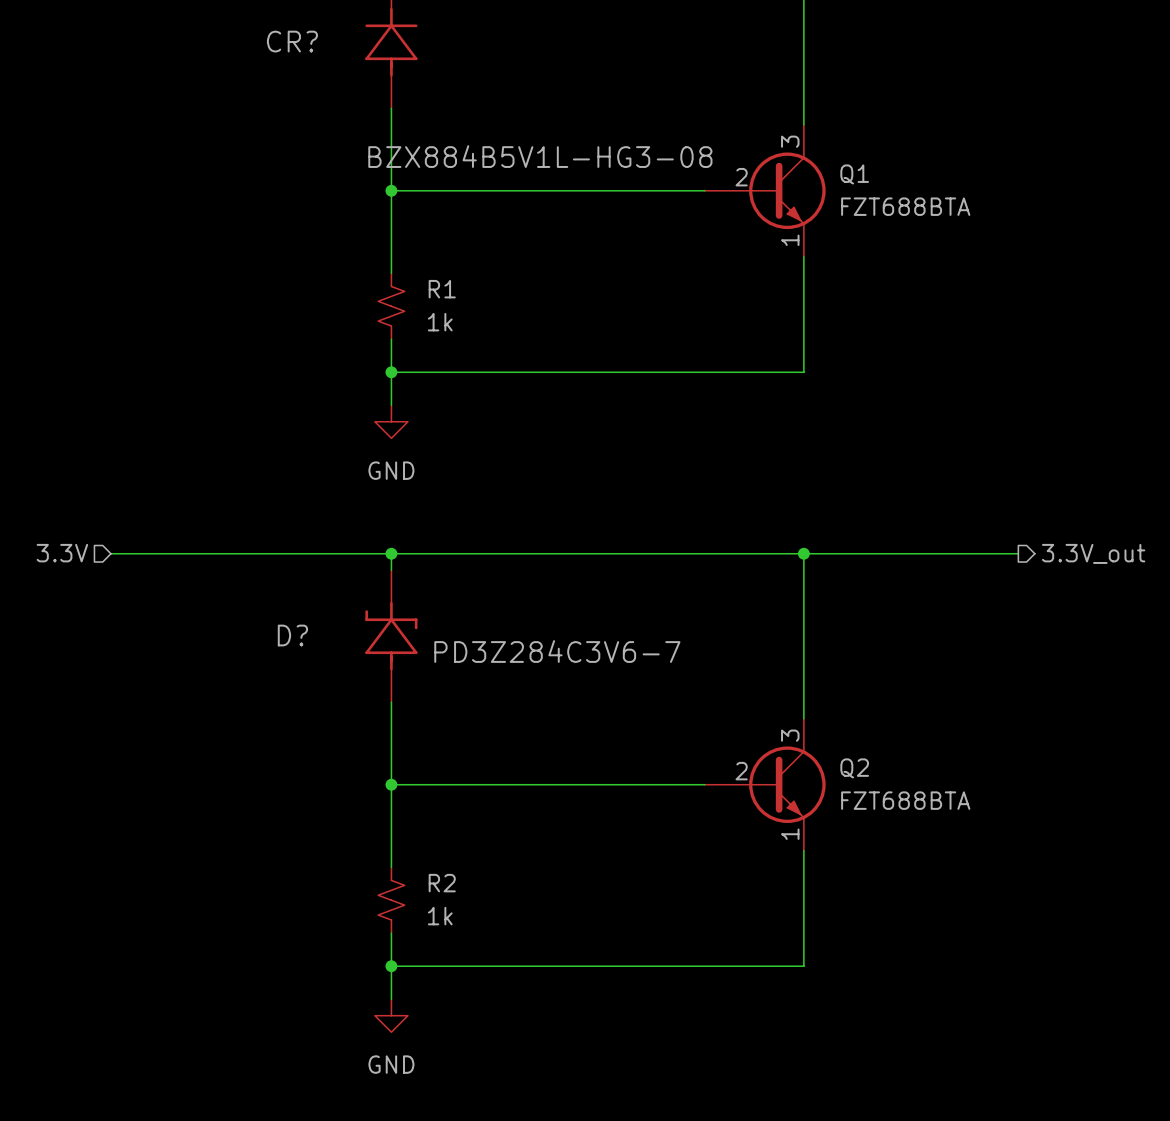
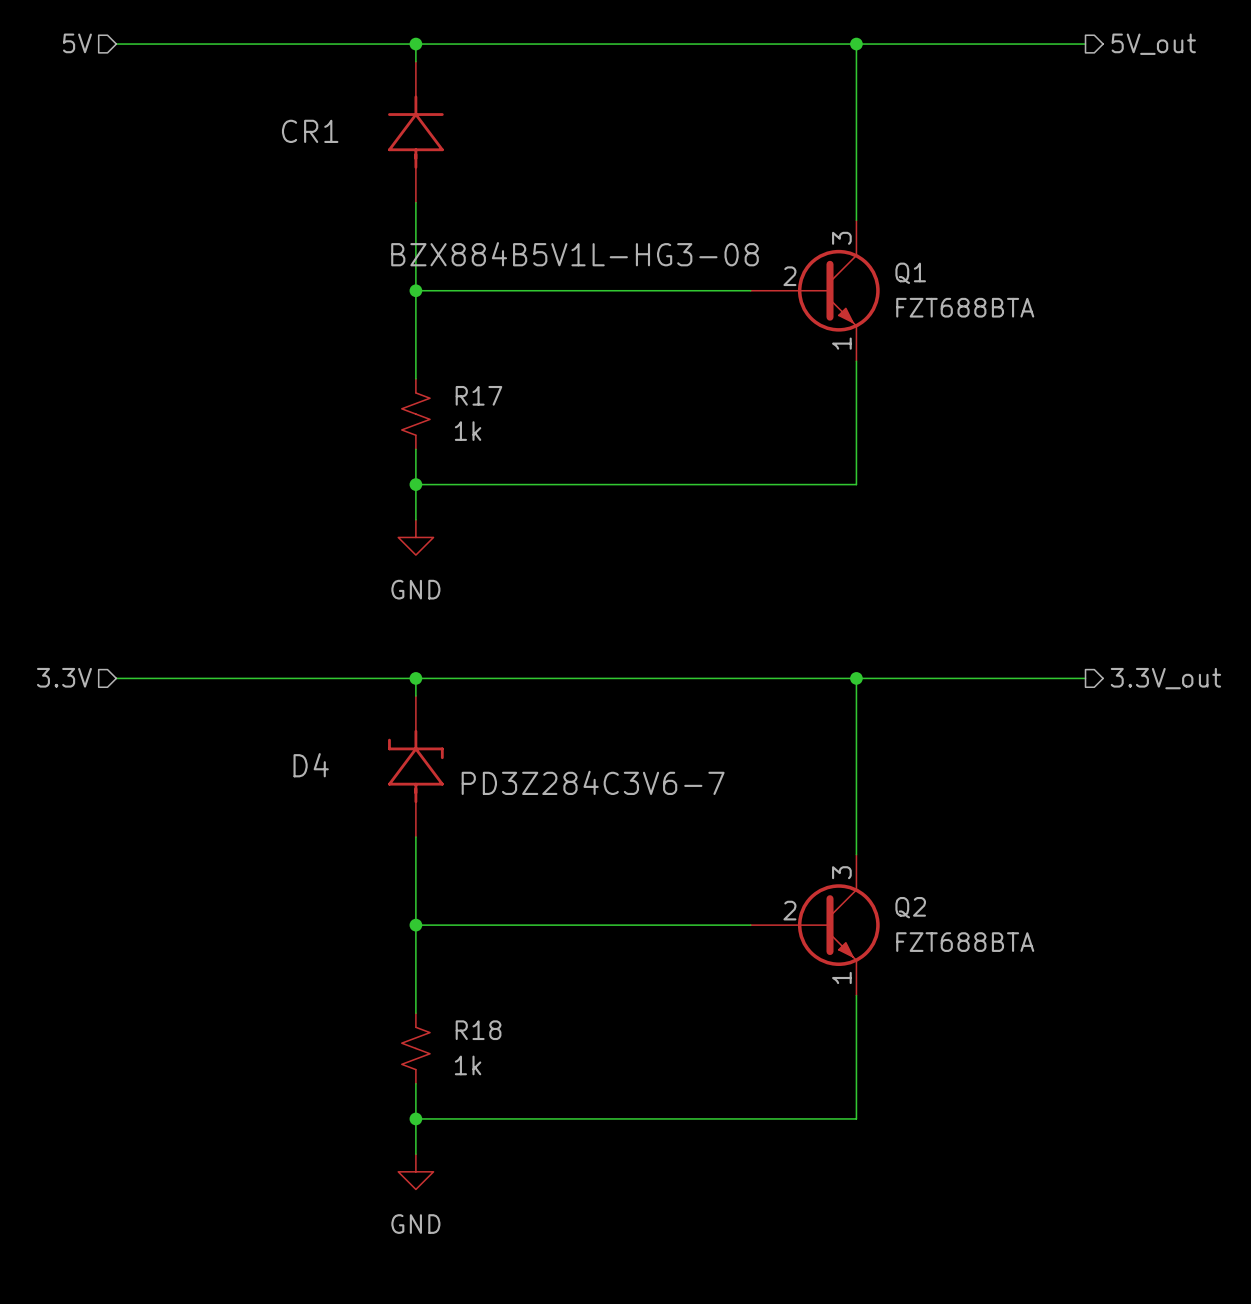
CR? name: CR? (292, 41) -> CR1 (310, 131)
R1 name: R1 (442, 289) -> R17 (478, 395)
D? name: D? (292, 635) -> D4 (311, 765)
R2 name: R2 (442, 883) -> R18 (478, 1030)

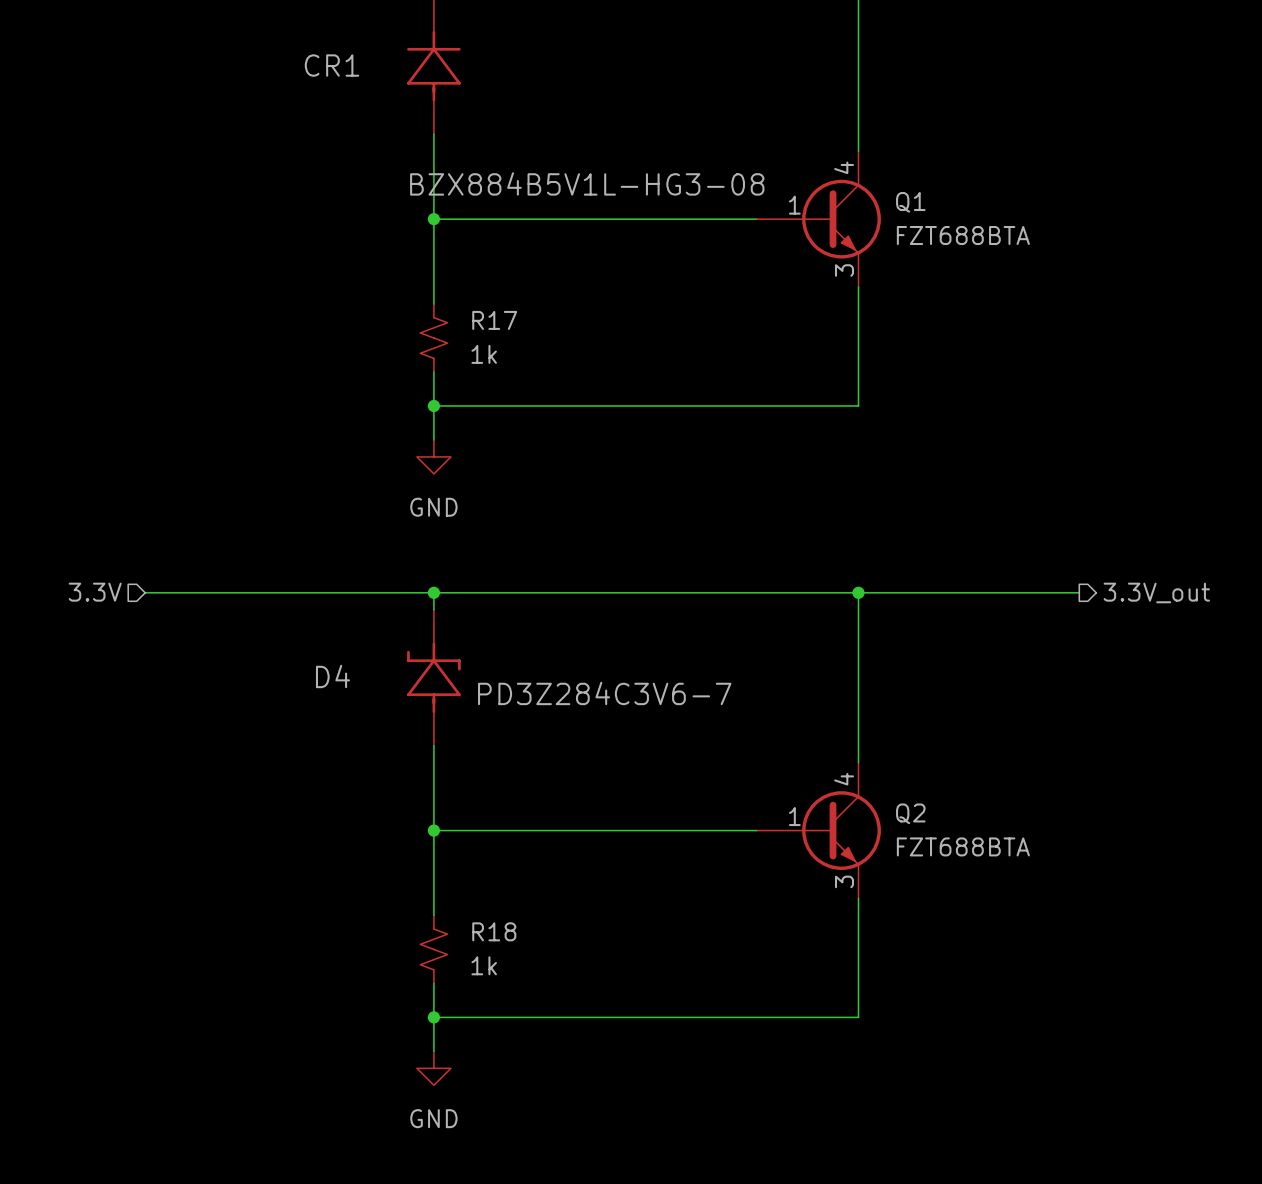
Q1 pin number: 3 (841, 238) -> 4 (844, 167)
Q1 pin number: 2 (789, 276) -> 1 (794, 205)
Q1 pin number: 1 (841, 343) -> 3 (844, 270)
Q2 pin number: 3 (841, 872) -> 4 (844, 779)
Q2 pin number: 2 (789, 910) -> 1 (794, 816)
Q2 pin number: 1 (841, 977) -> 3 (844, 881)

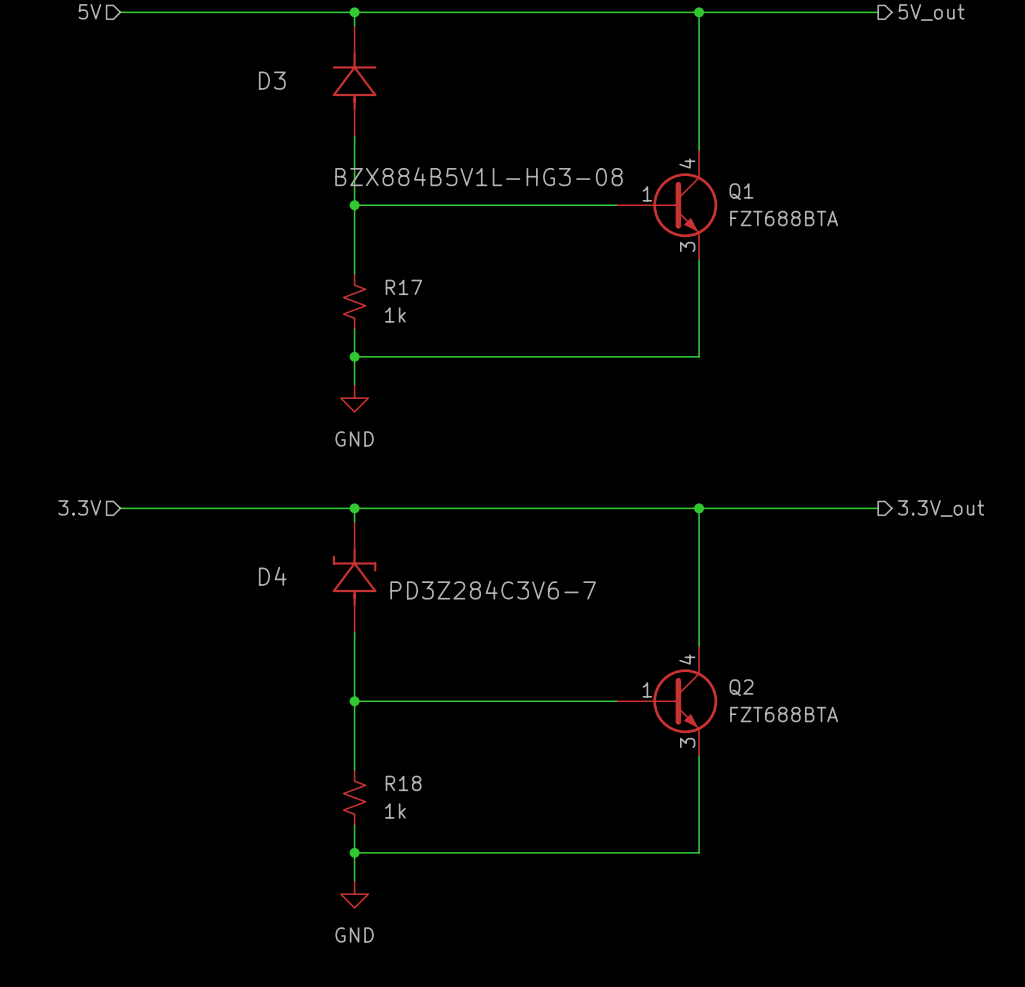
CR1 name: CR1 (332, 65) -> D3 (272, 80)

